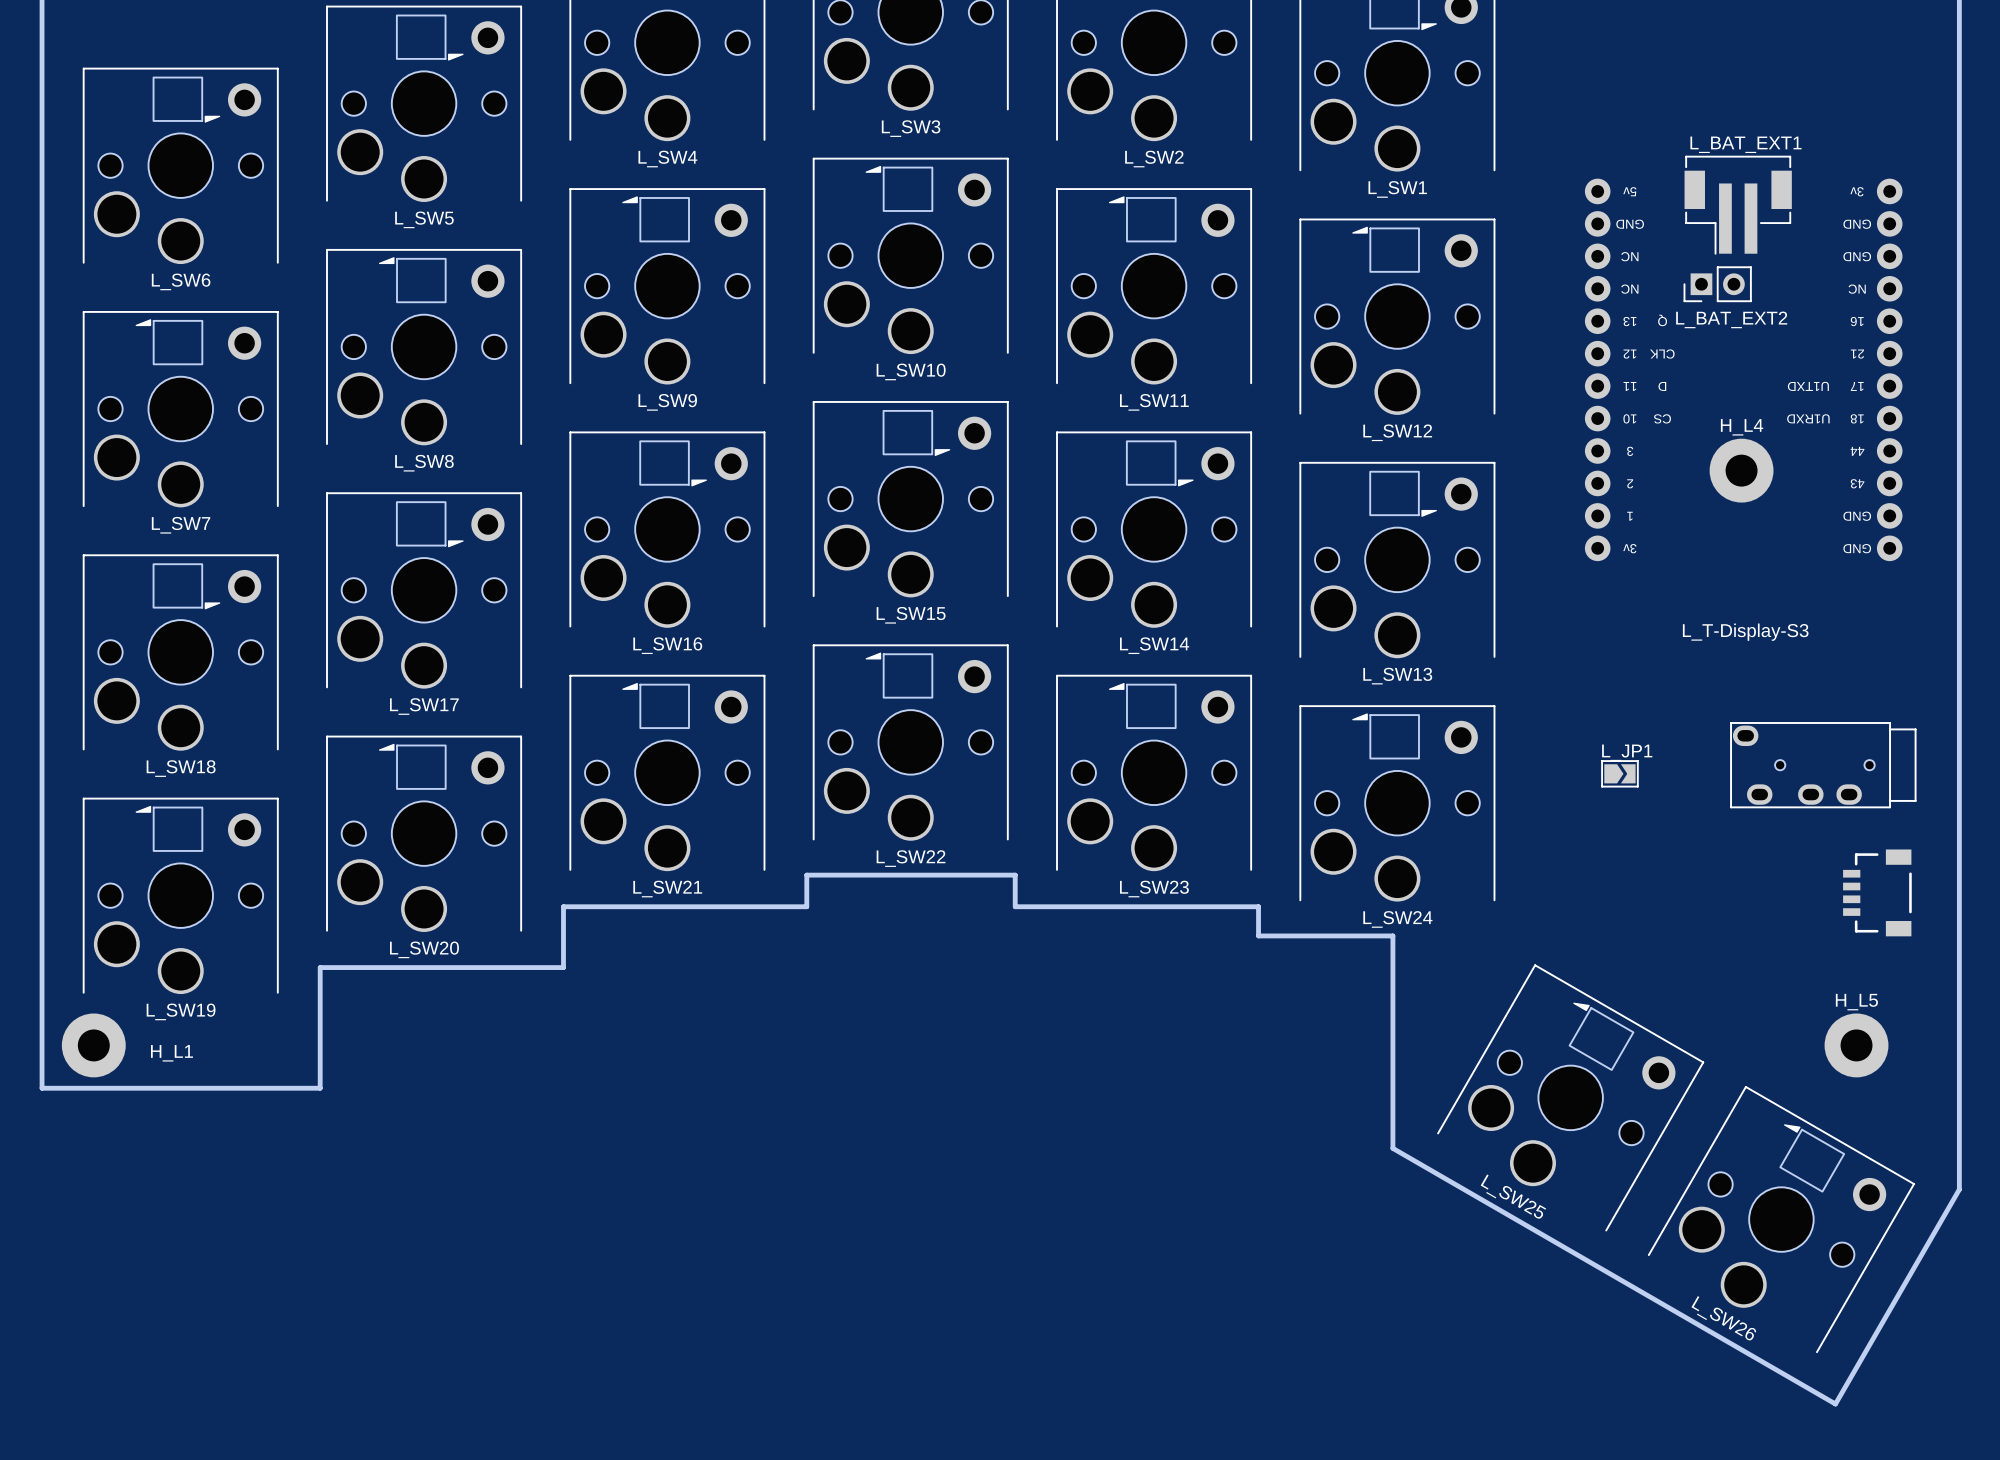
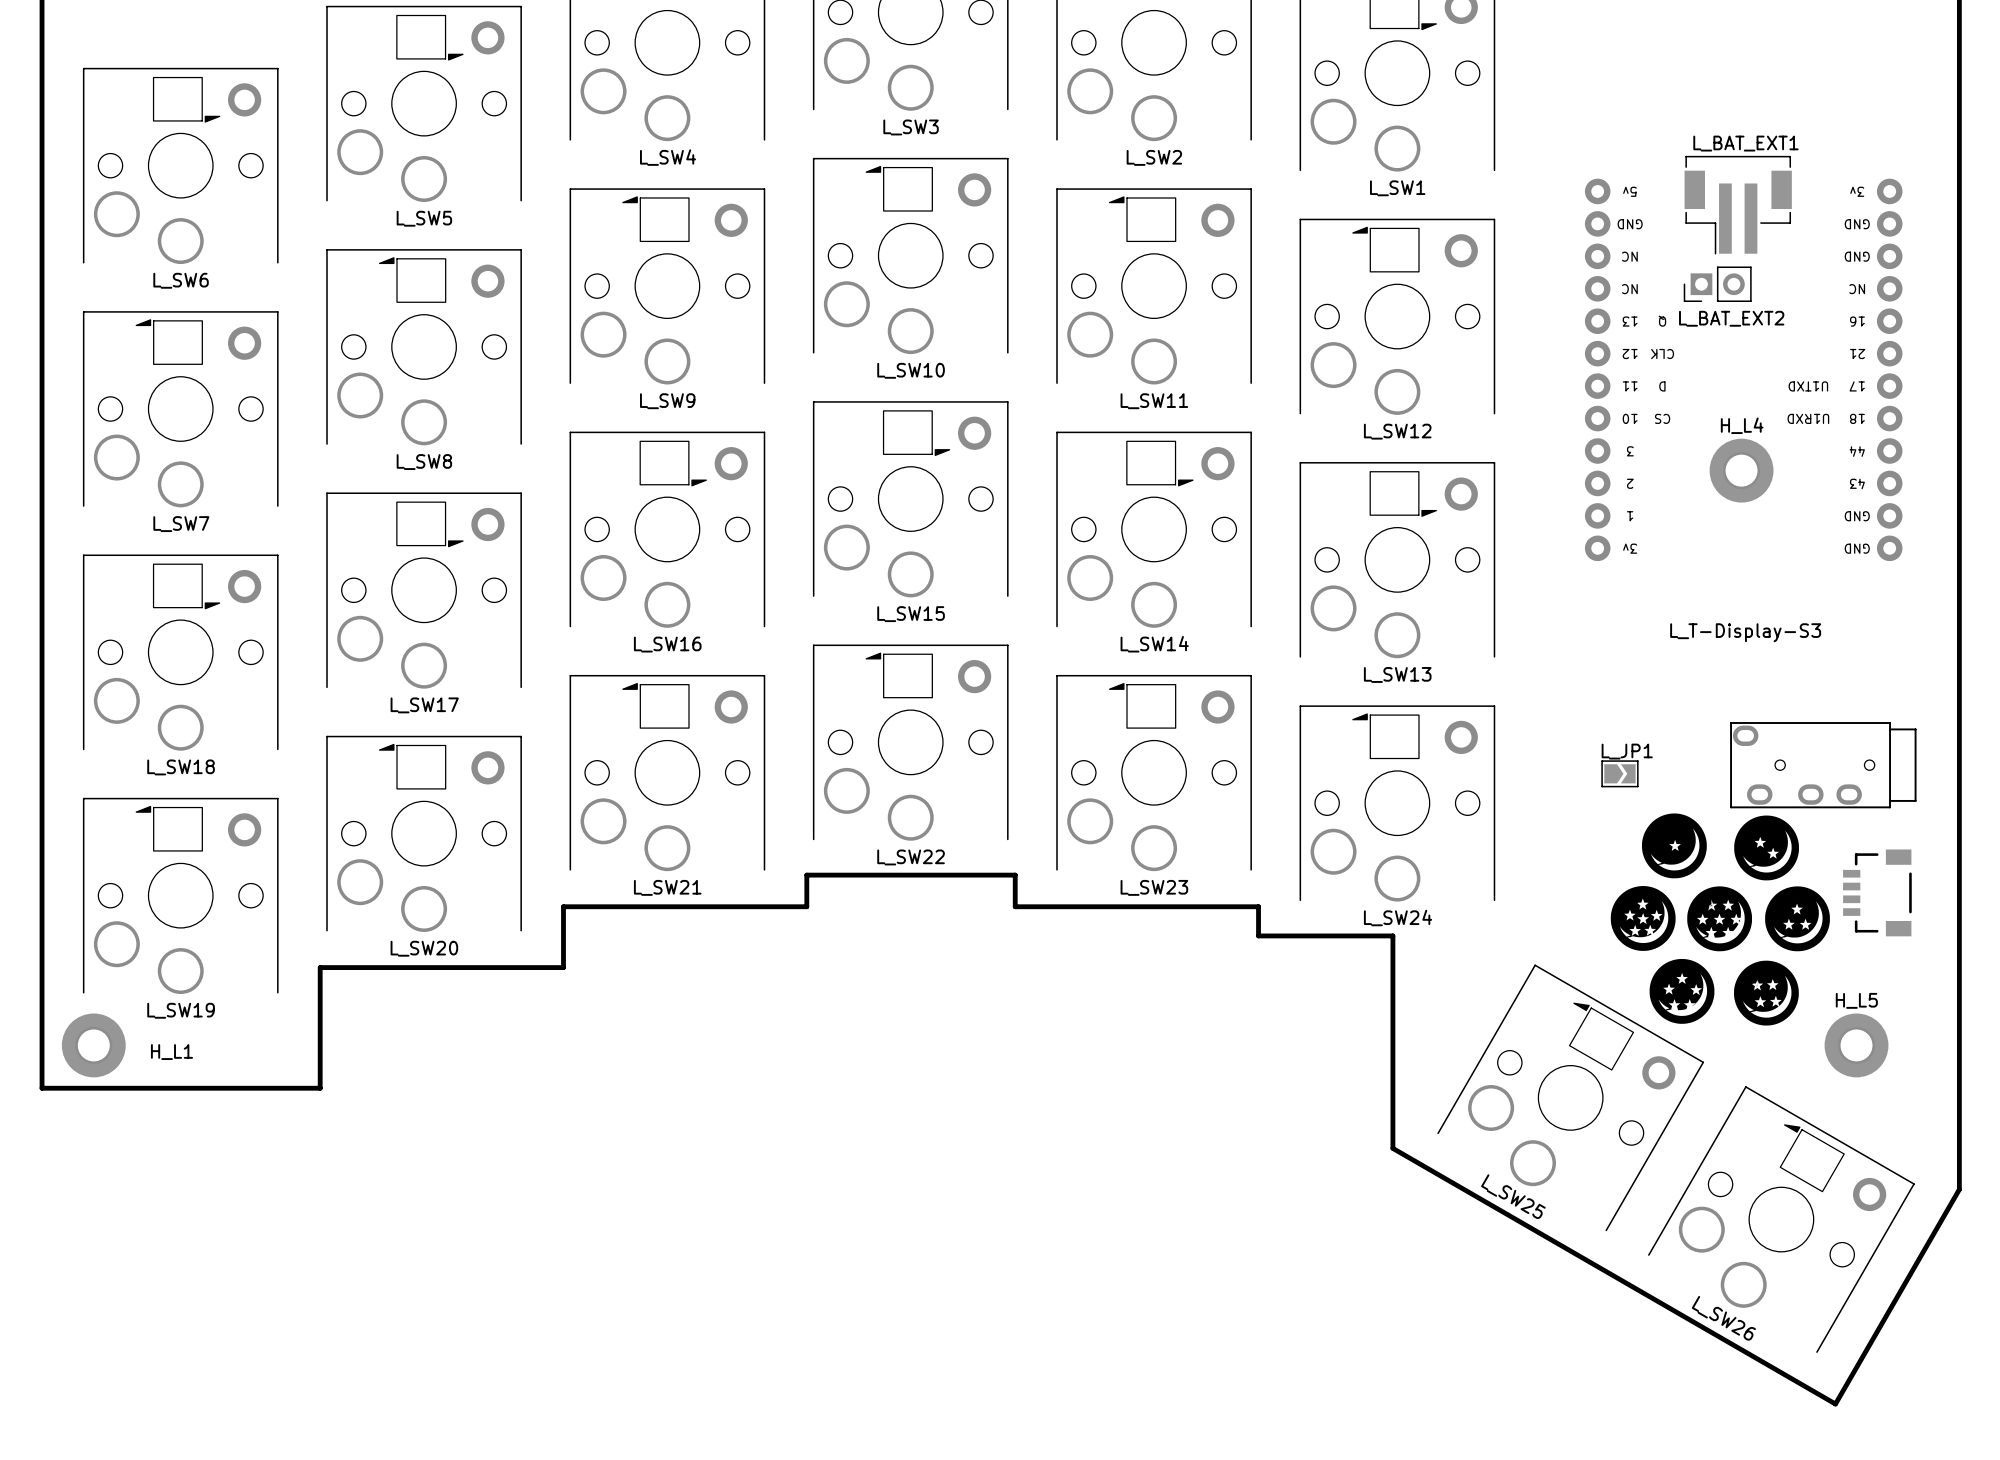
drawing: none -> [1610, 813, 1830, 1026]

